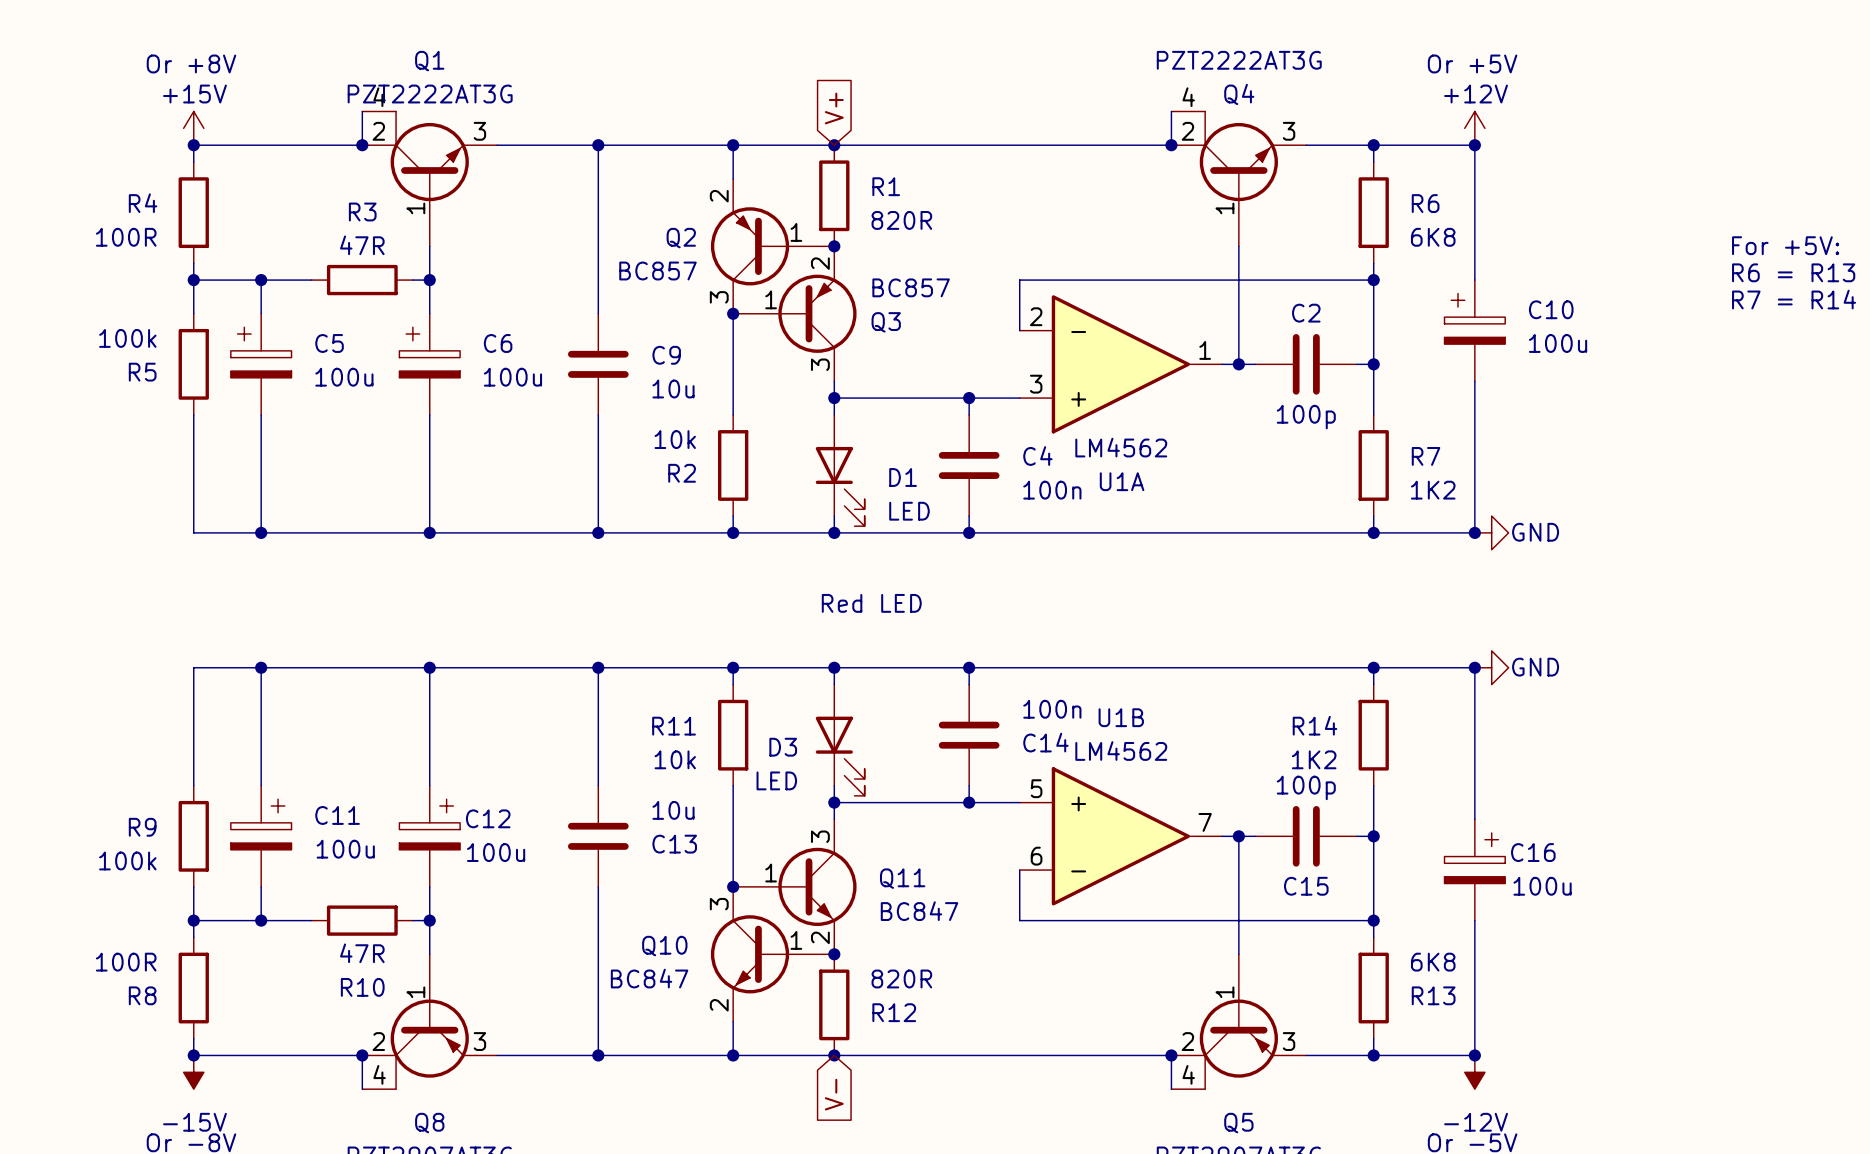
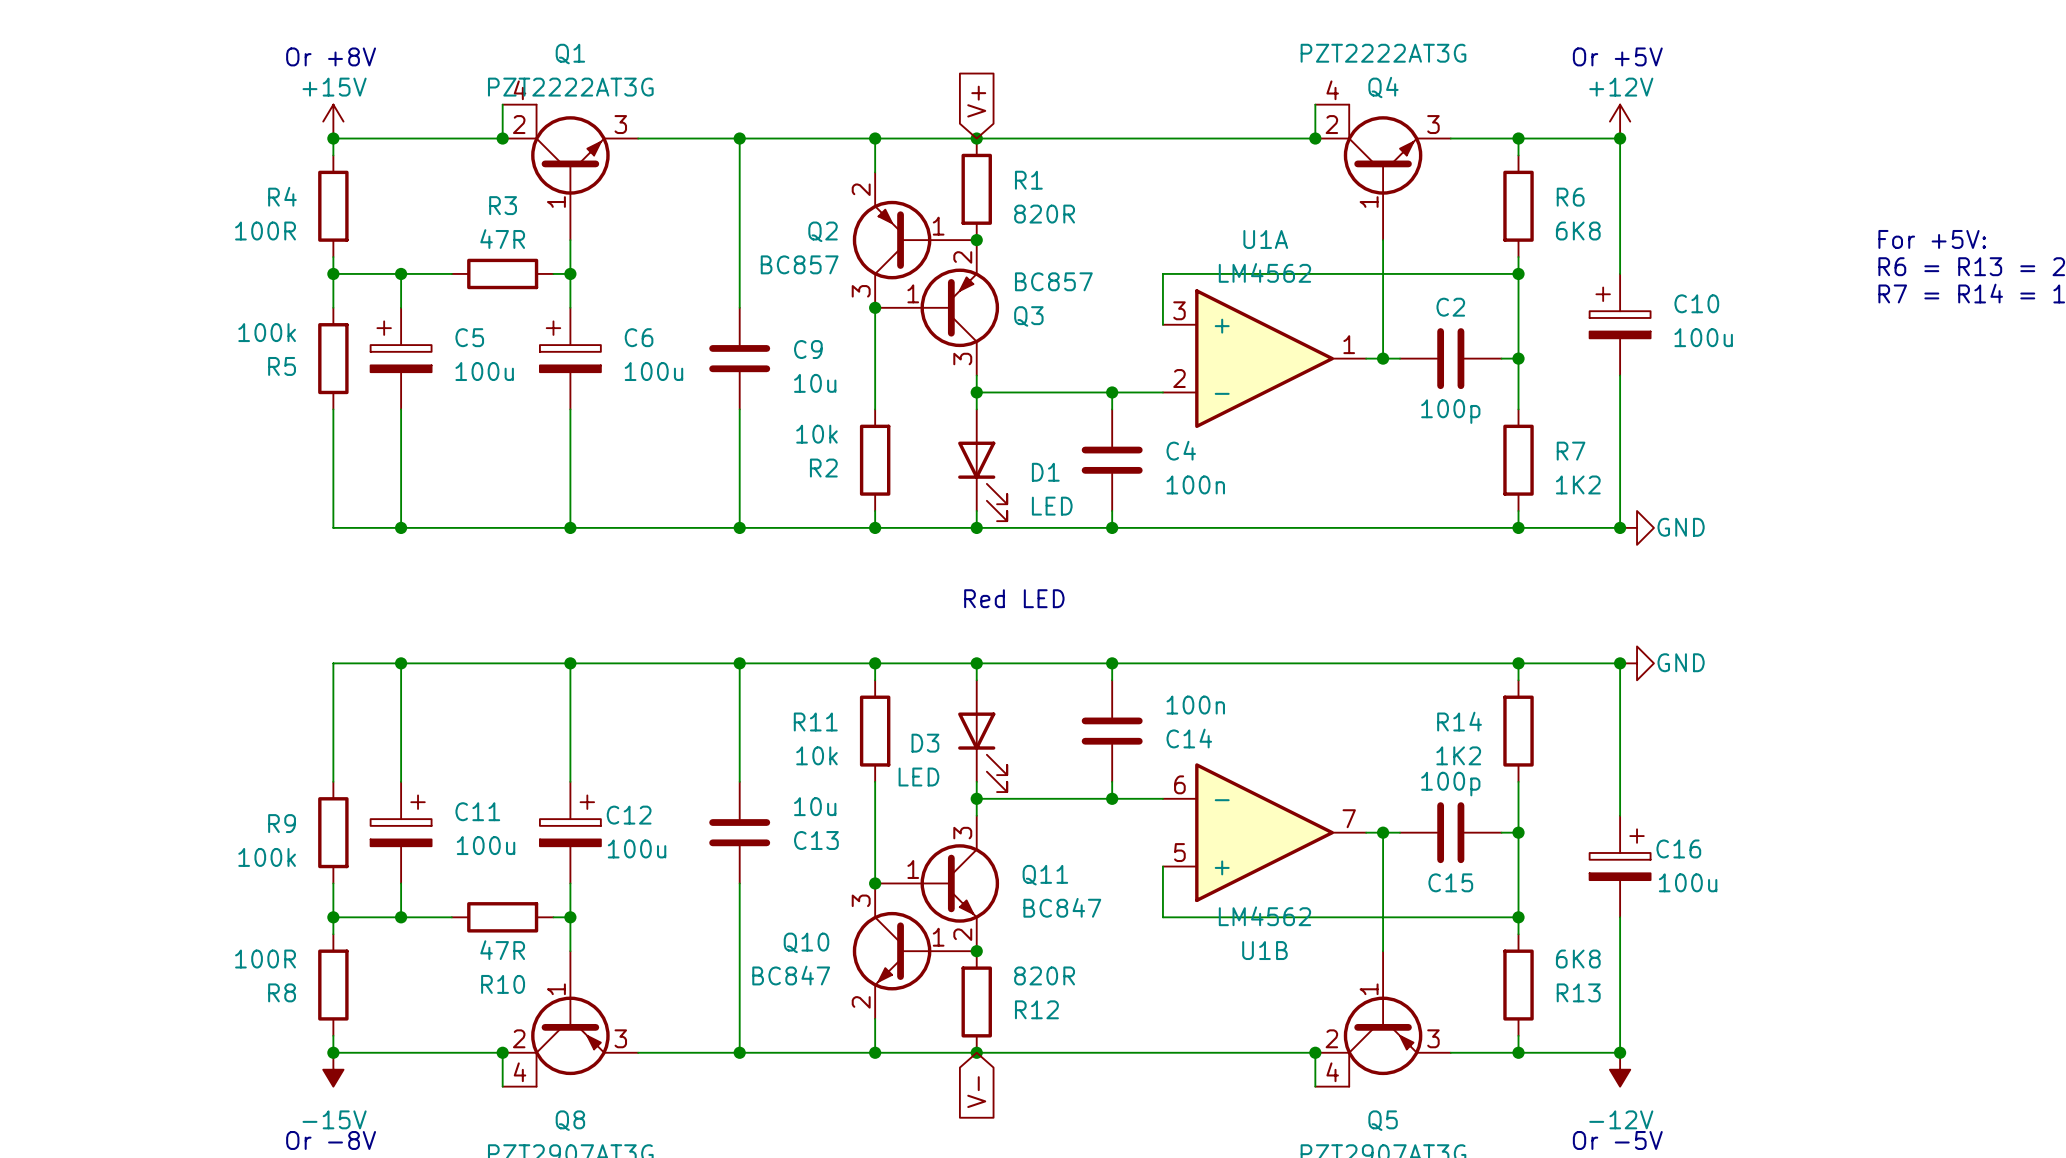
U1A flip: as is (1120, 364) -> up-down (1264, 358)
U1B flip: as is (1120, 836) -> up-down (1264, 832)

